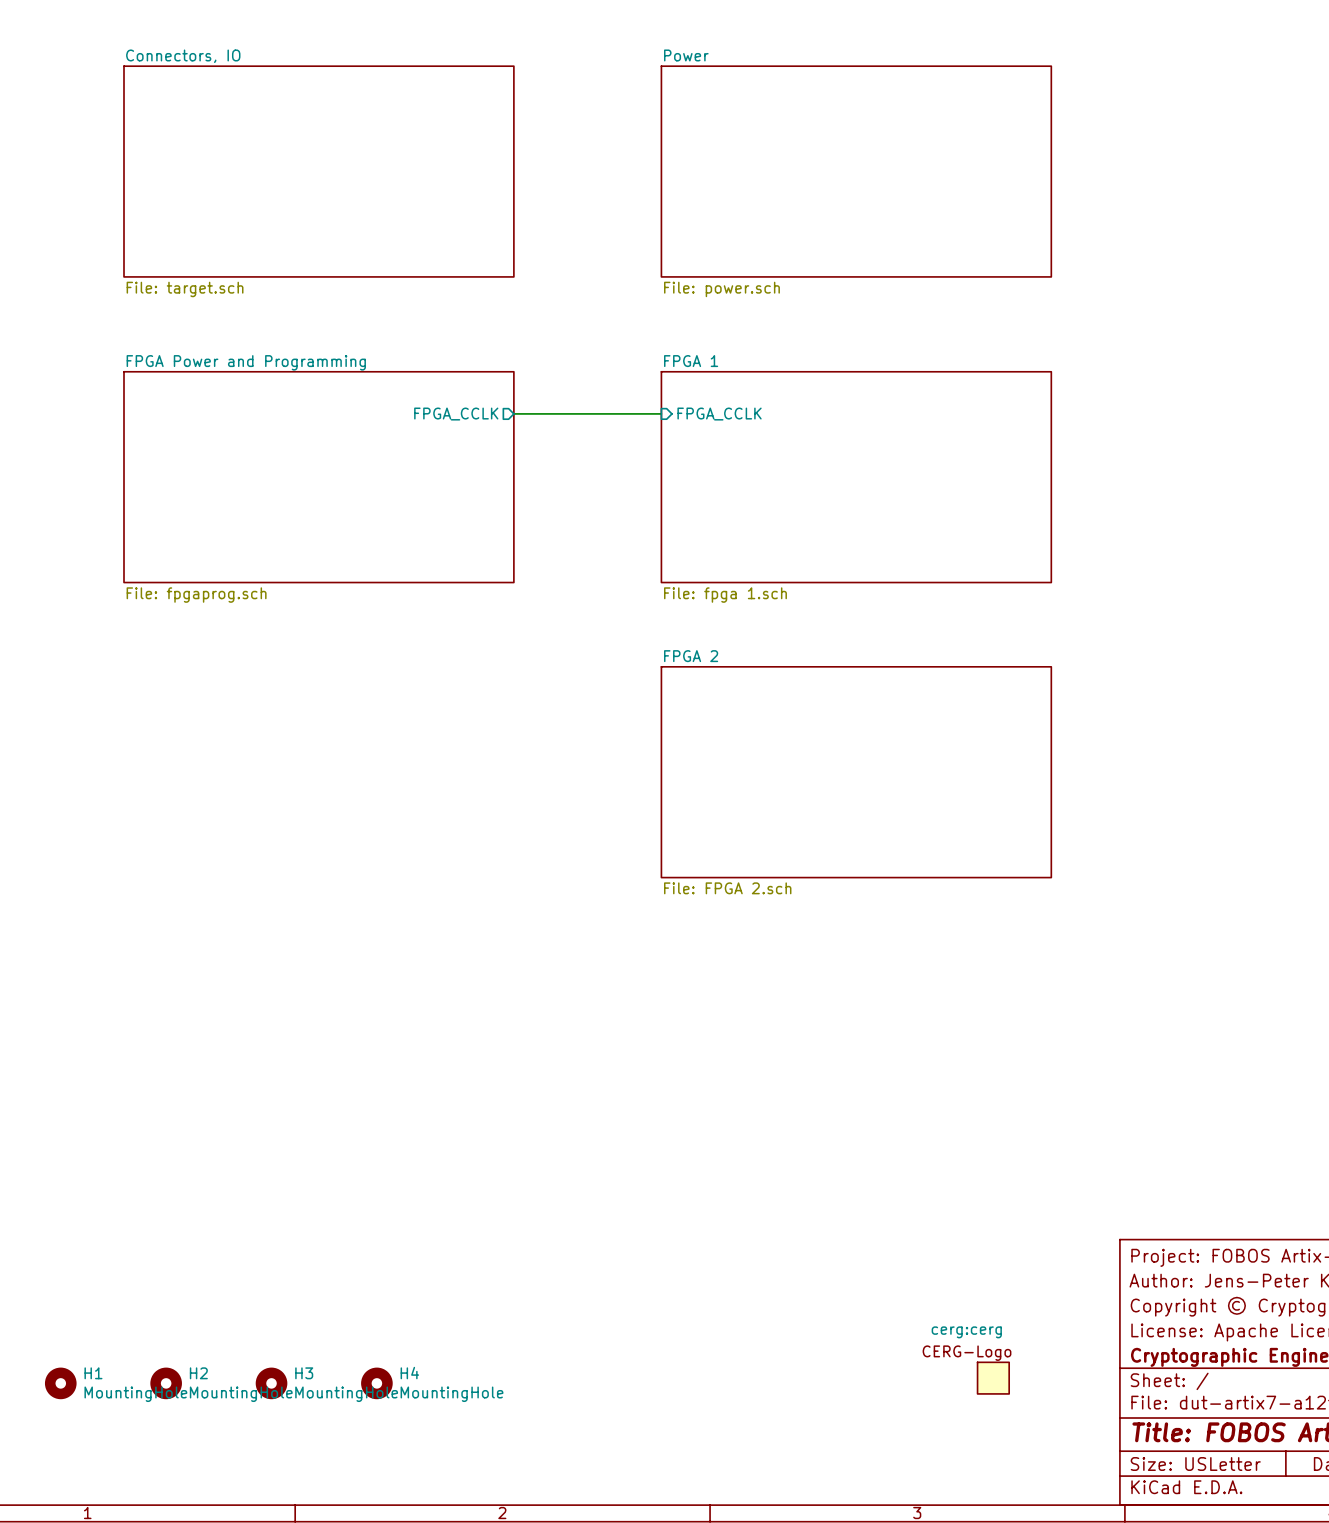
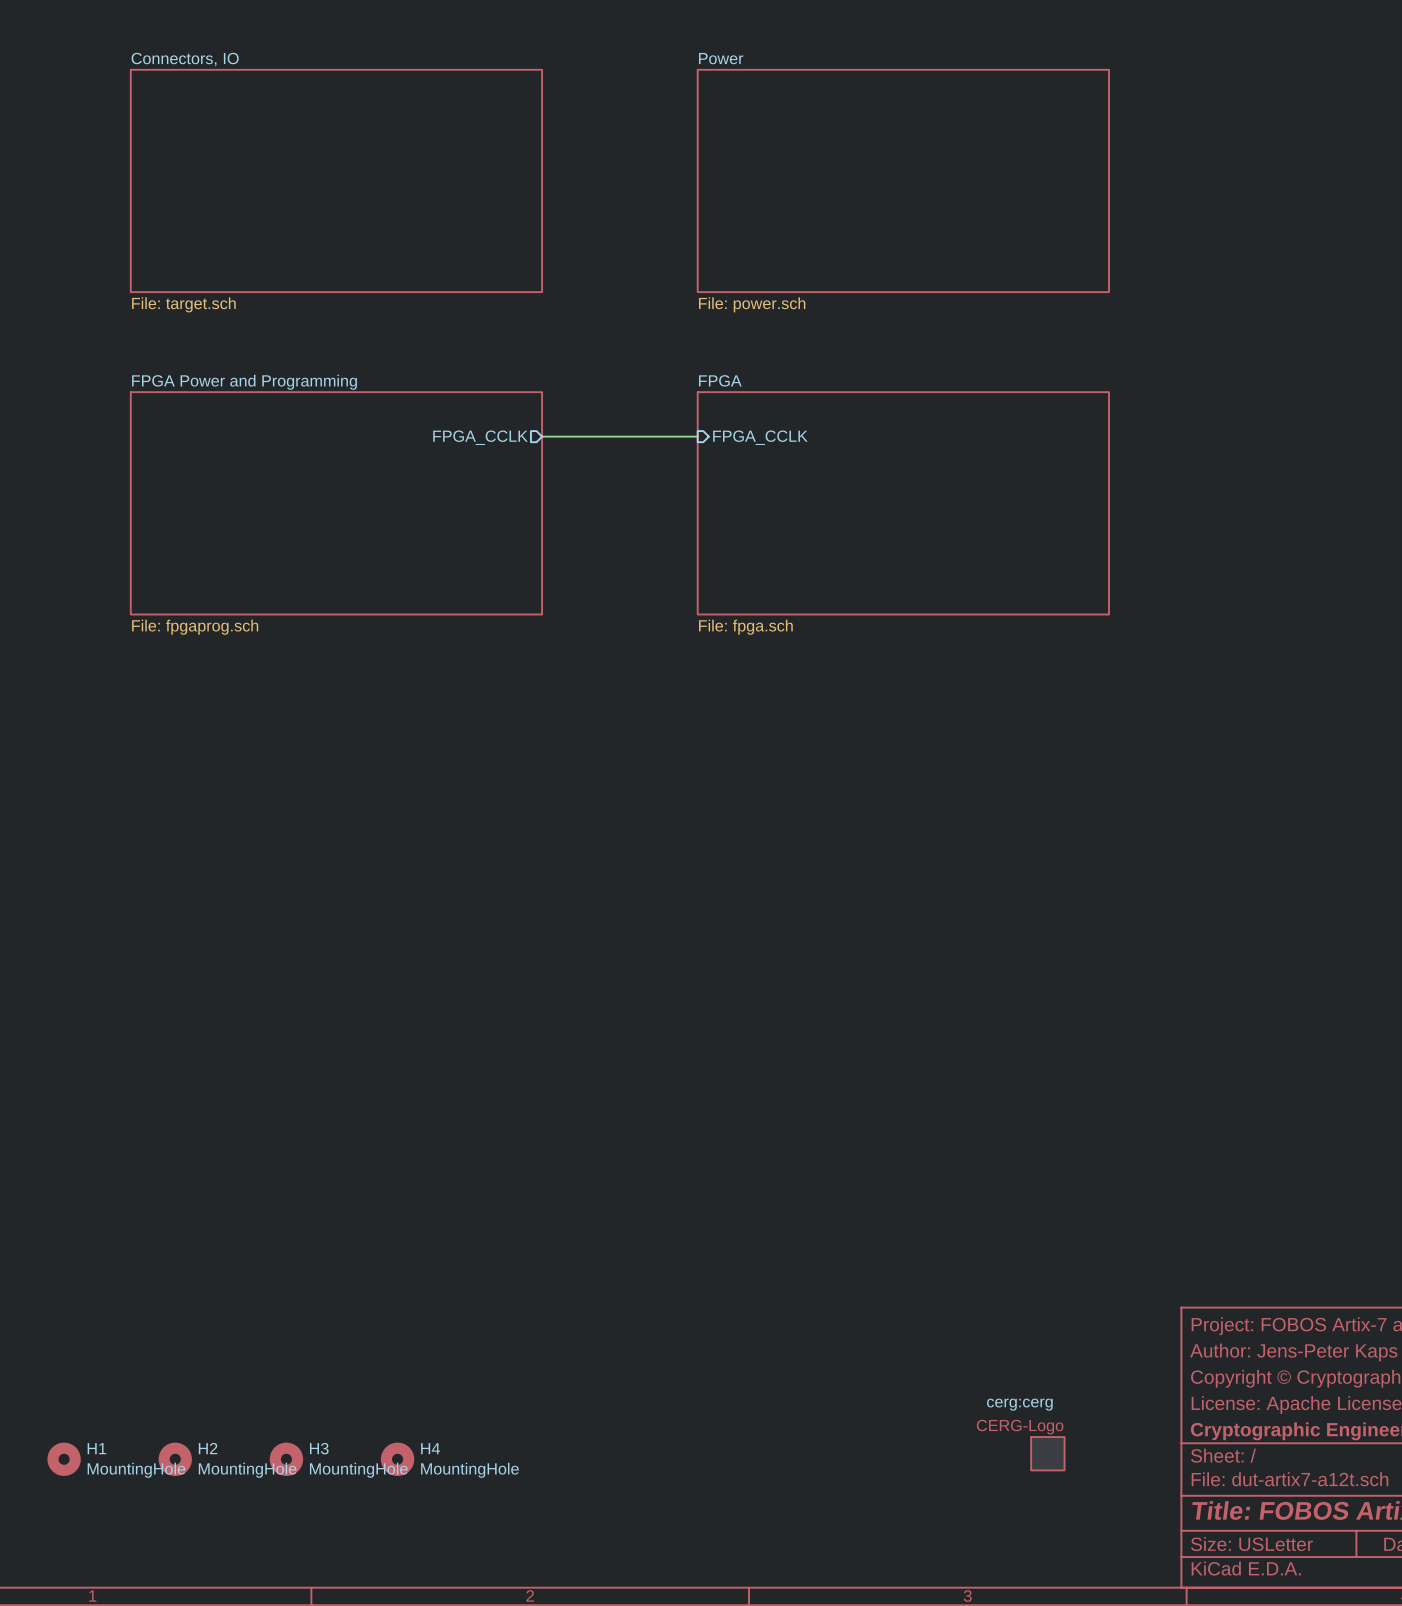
sheet FPGA 1 name: FPGA 1 (691, 361) -> FPGA (720, 380)
sheet FPGA 1 value: File: fpga 1.sch (725, 595) -> File: fpga.sch (745, 627)
sheet FPGA 2: File: FPGA 2.sch (856, 772) -> none

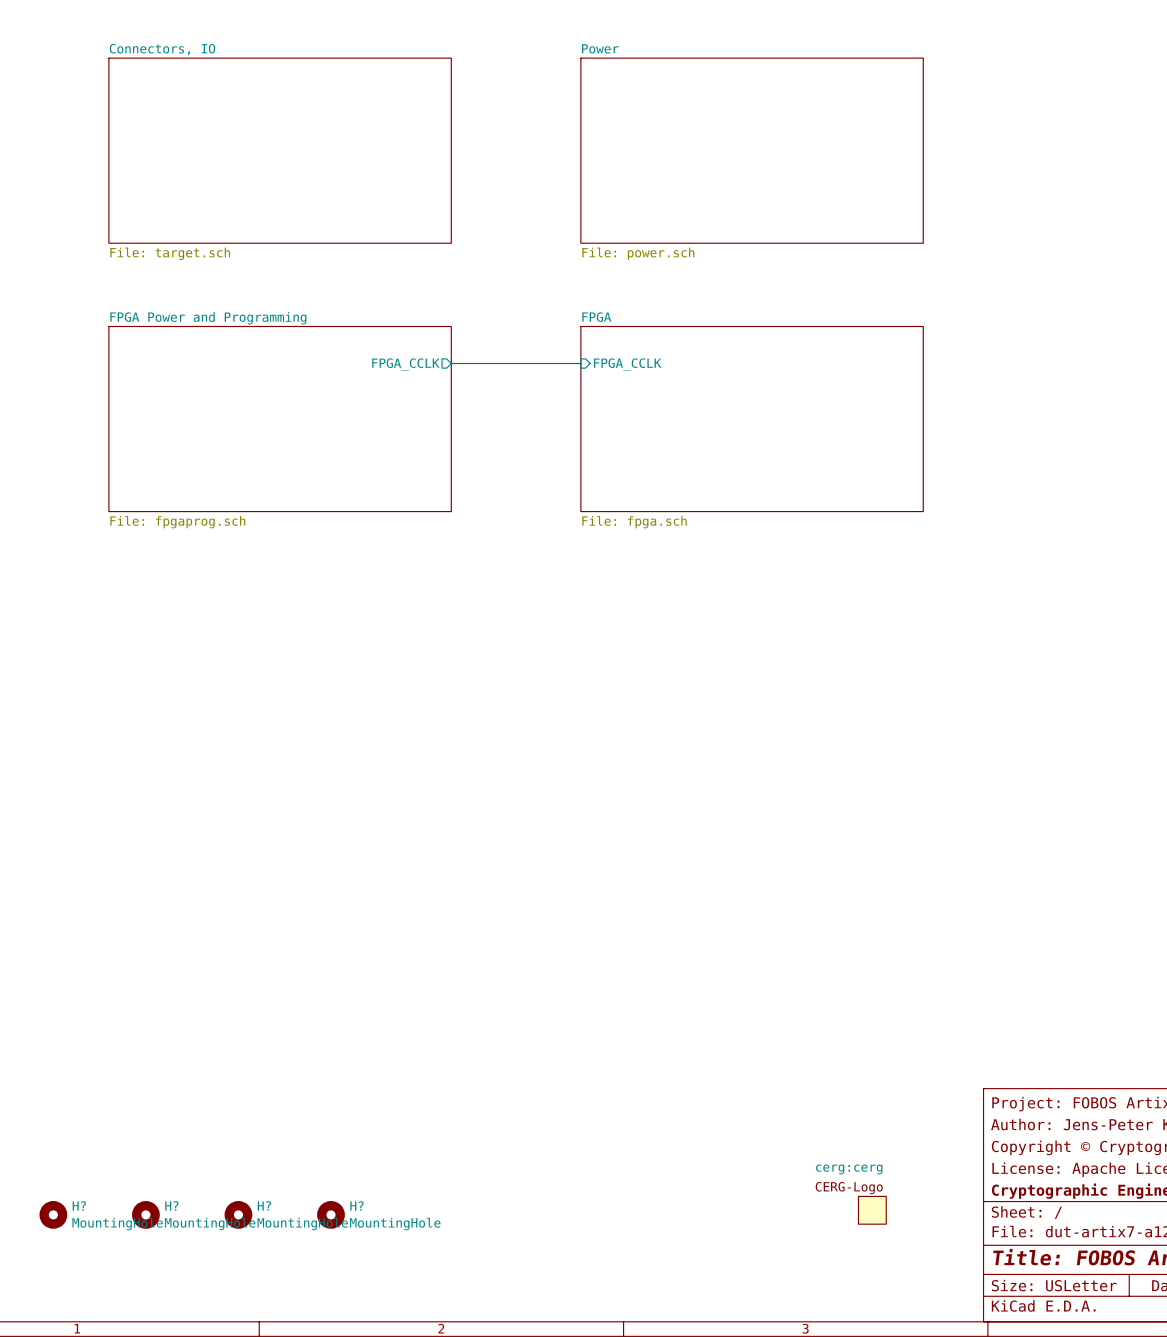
H1 name: H1 (96, 1448) -> H? (79, 1205)
H2 name: H2 (208, 1448) -> H? (171, 1205)
H3 name: H3 (319, 1448) -> H? (264, 1205)
H4 name: H4 (430, 1448) -> H? (356, 1205)

